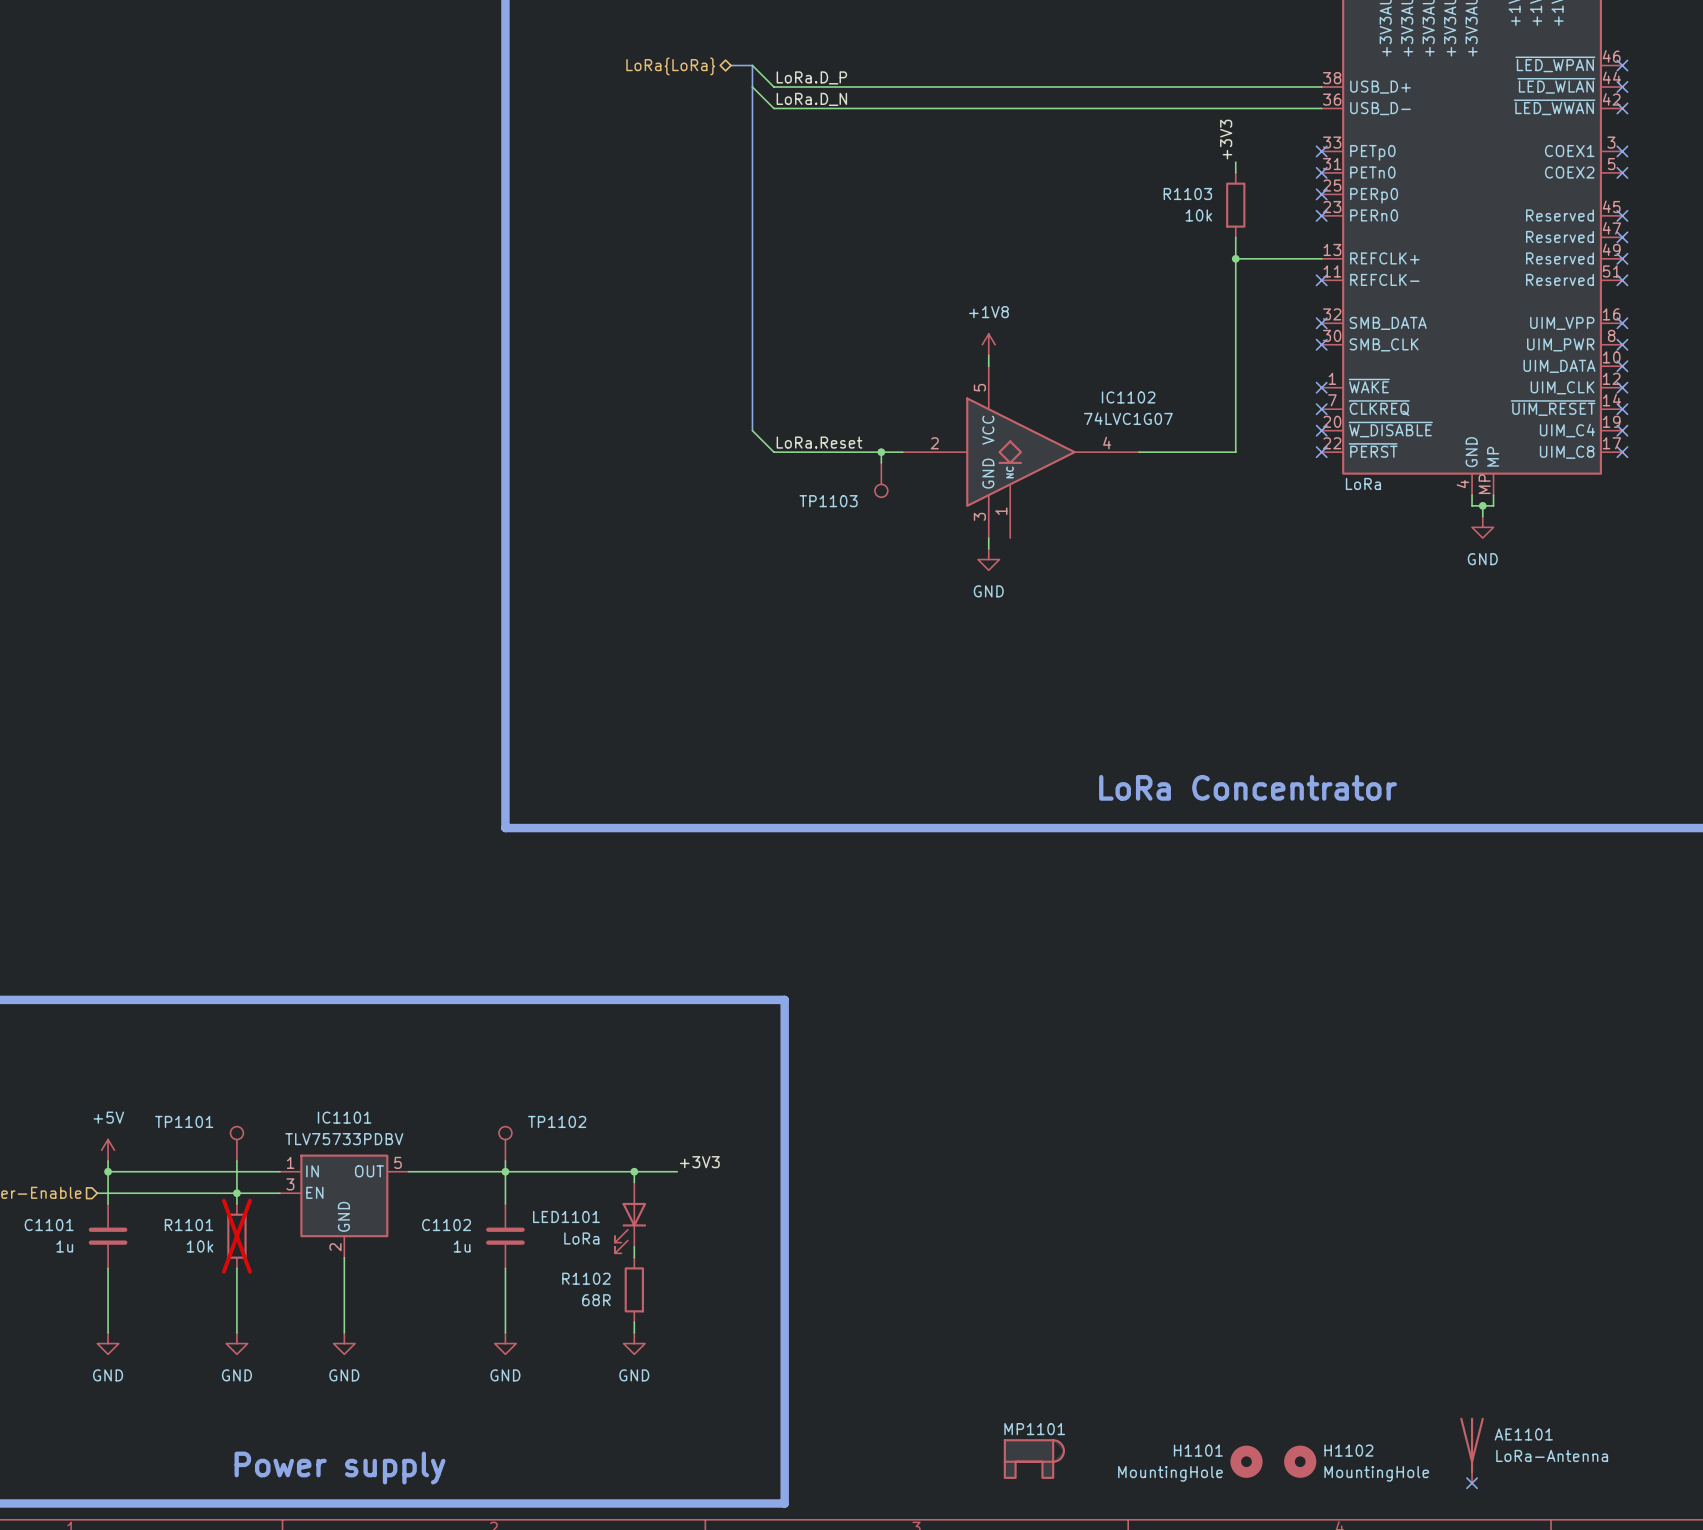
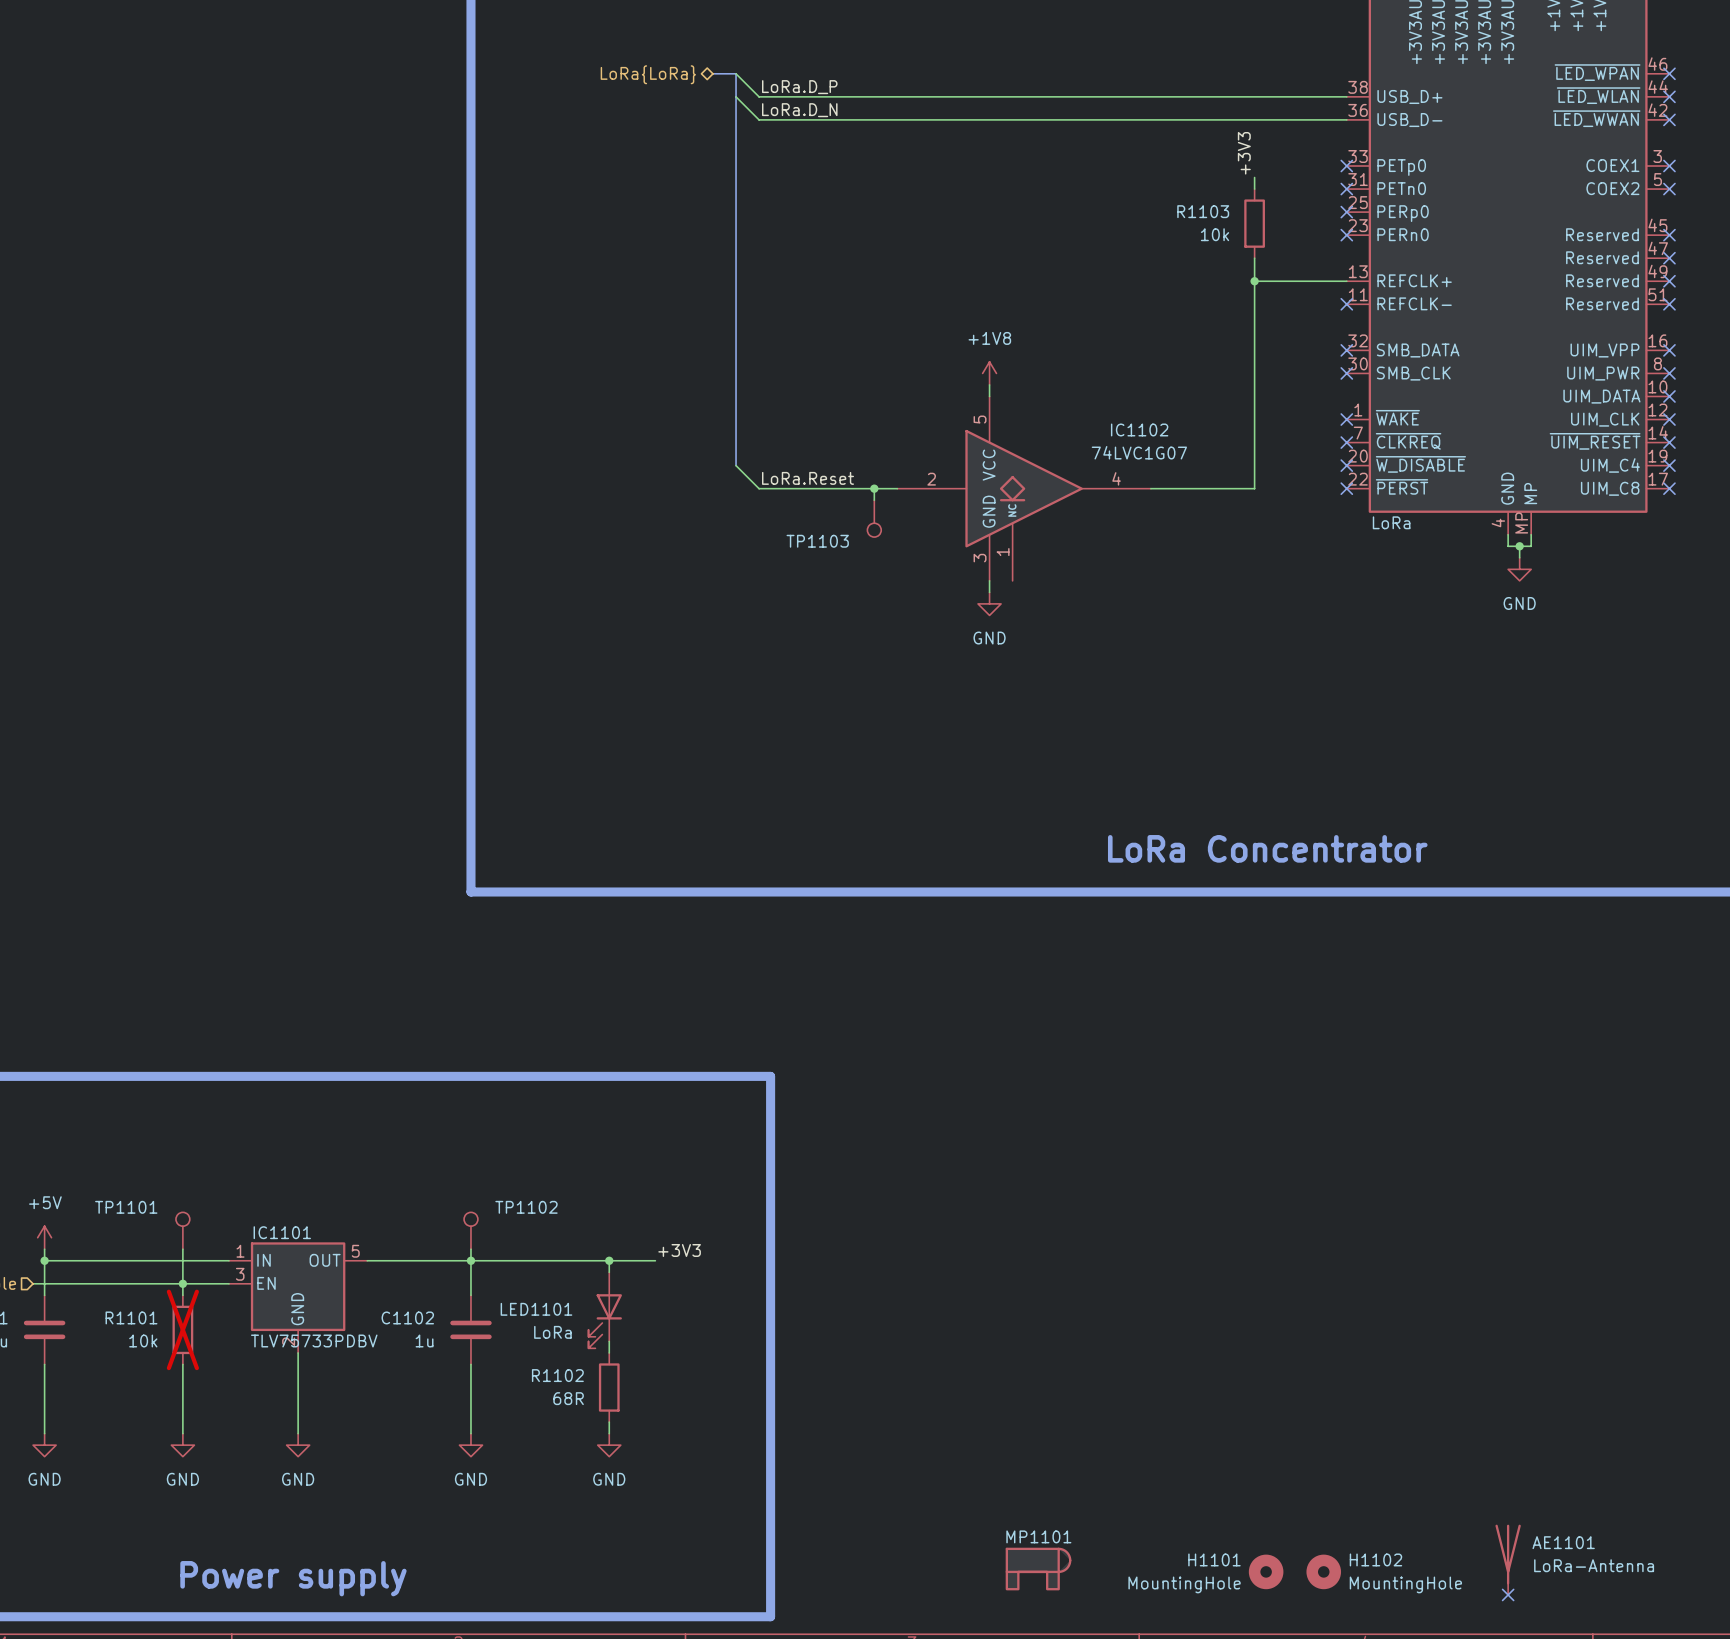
IC1101 name position: IC1101 (344, 1117) -> IC1101 (282, 1232)
IC1101 value position: TLV75733PDBV (344, 1139) -> TLV75733PDBV (314, 1341)

